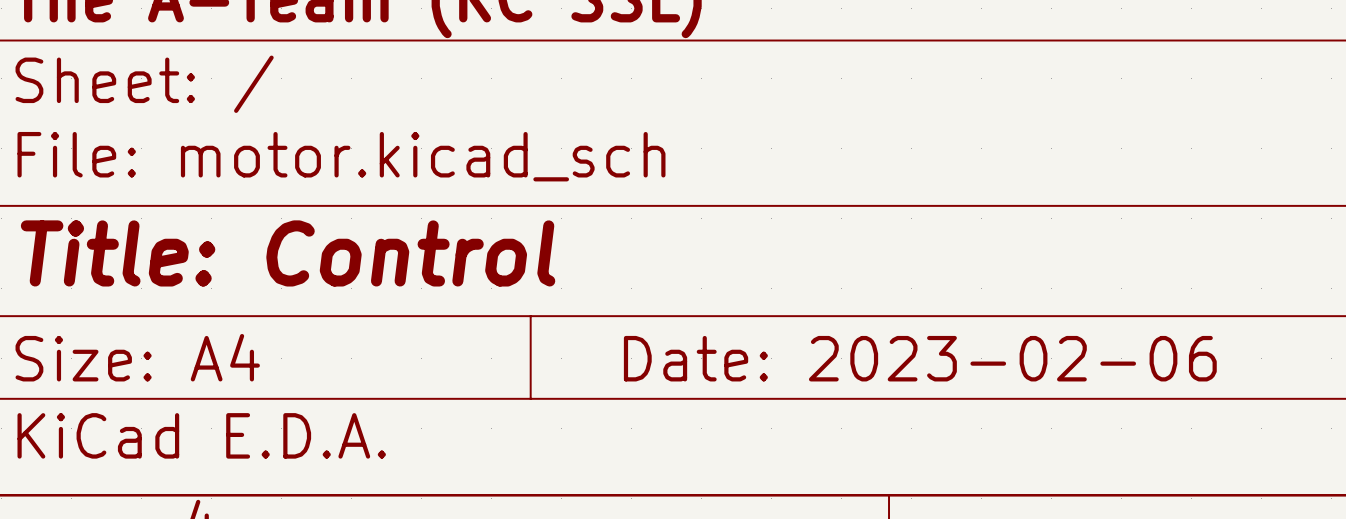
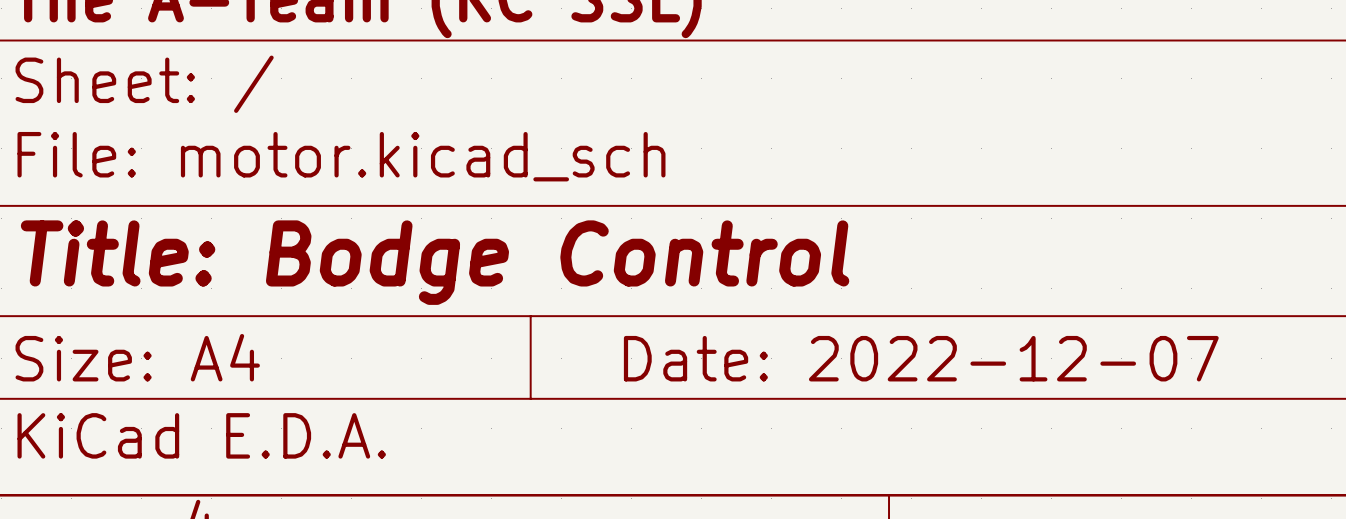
title block: Title: Control (288, 253) -> Title: Bodge Control (435, 262)
title block: Date: 2023-02-06 (920, 358) -> Date: 2022-12-07 (921, 358)

